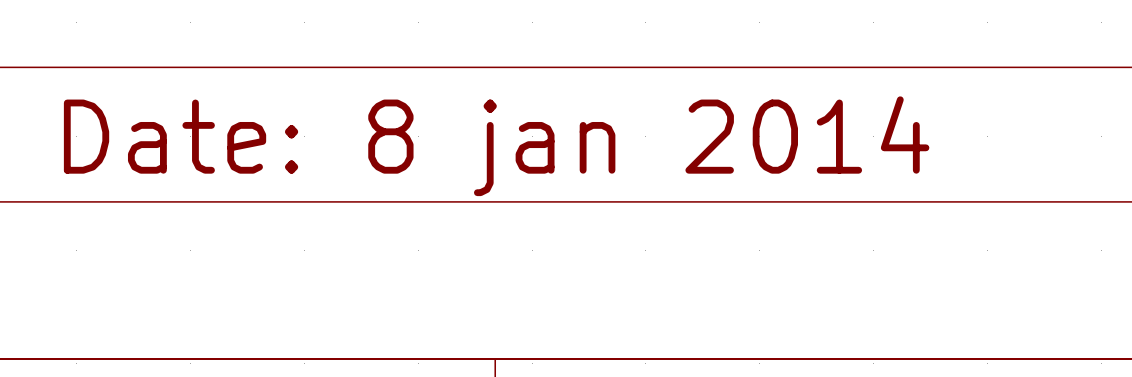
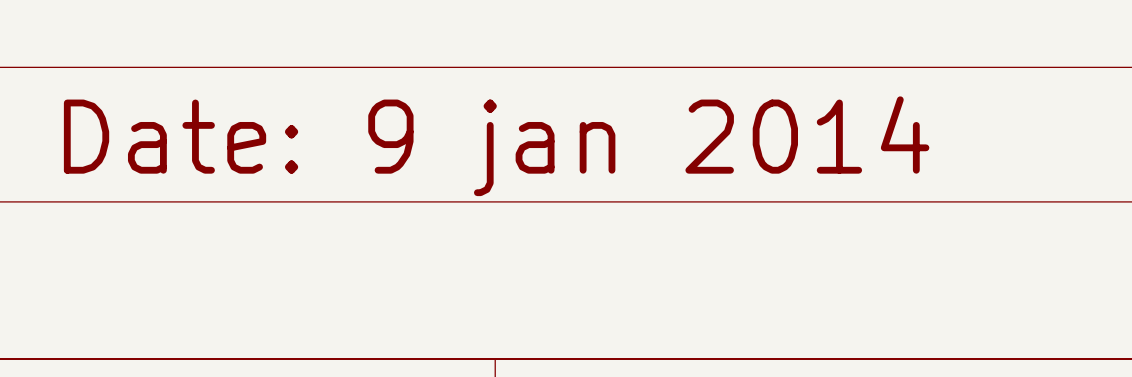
title block: Date: 8 jan 2014 (496, 146) -> Date: 9 jan 2014 (496, 146)

